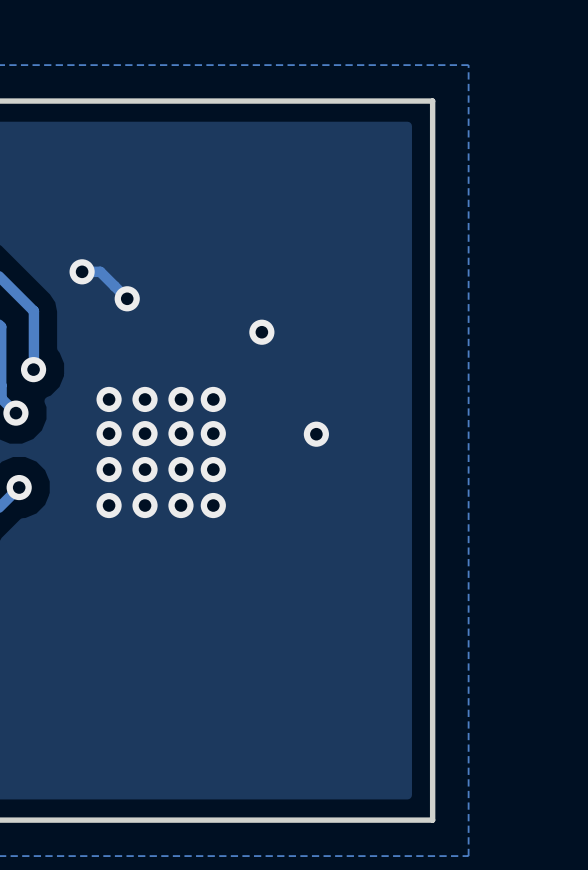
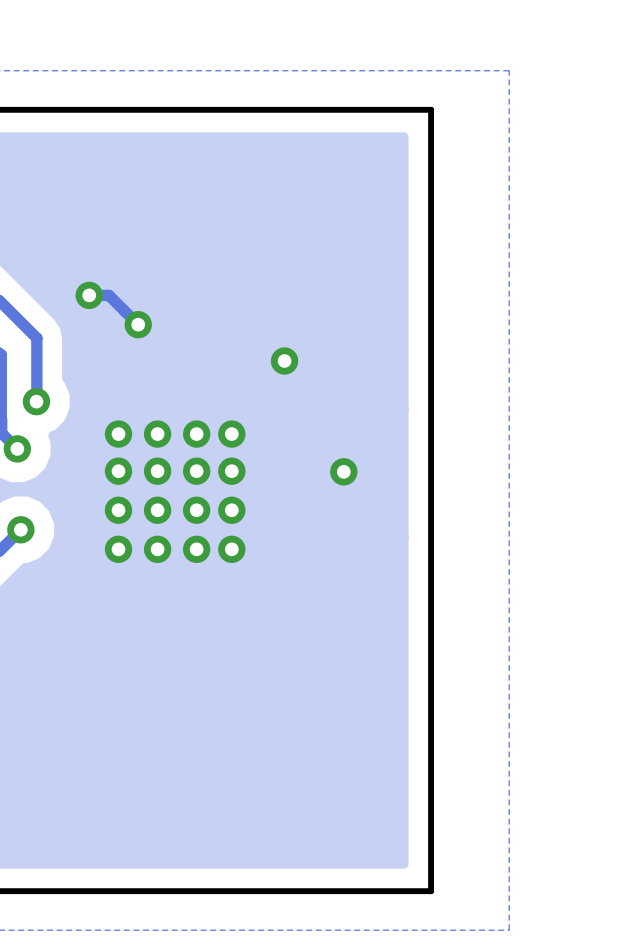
board edge: (396, 101) (432, 101) (432, 820) (396, 820) -> (431, 109) (431, 891)

